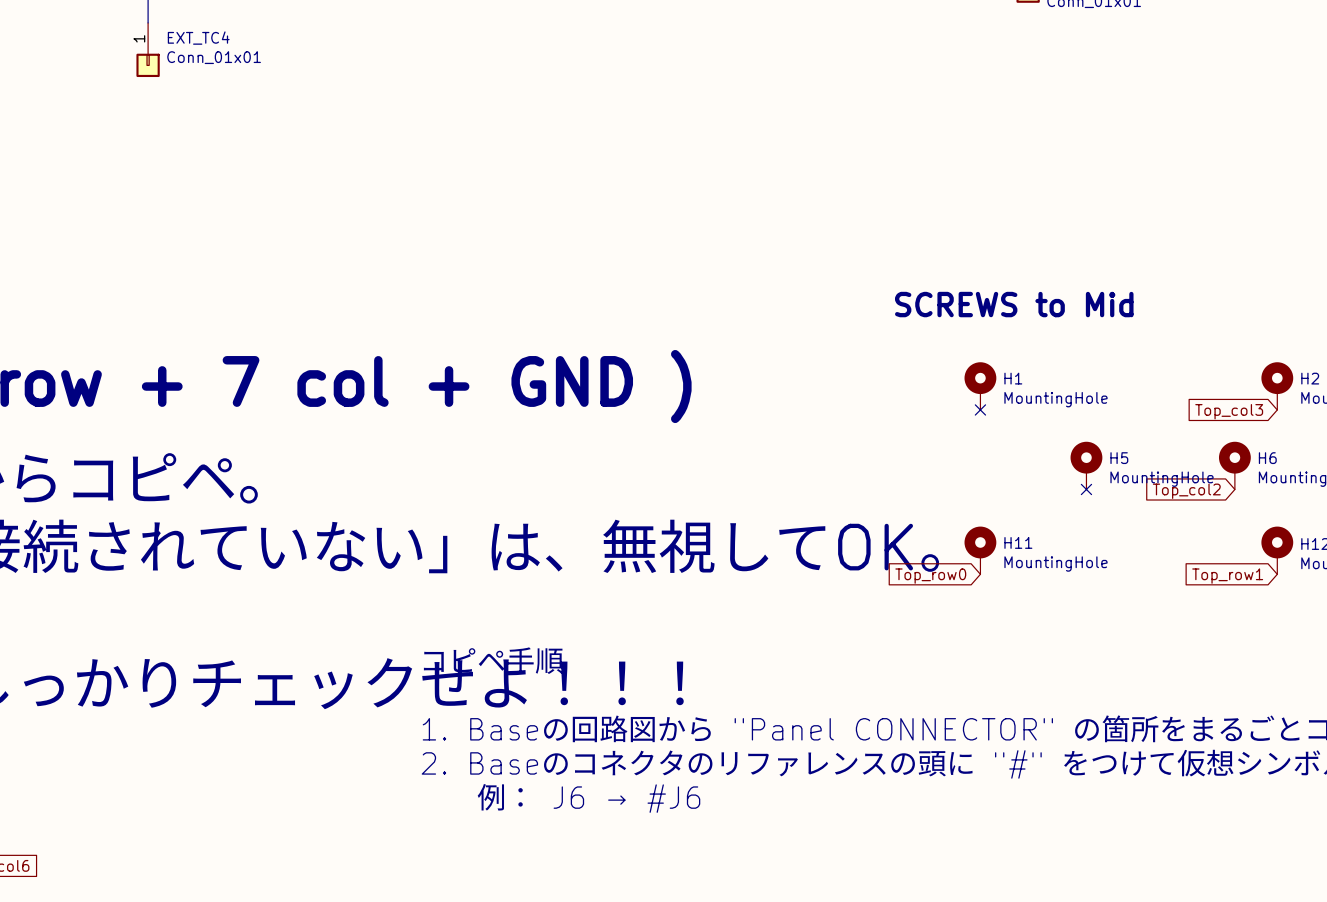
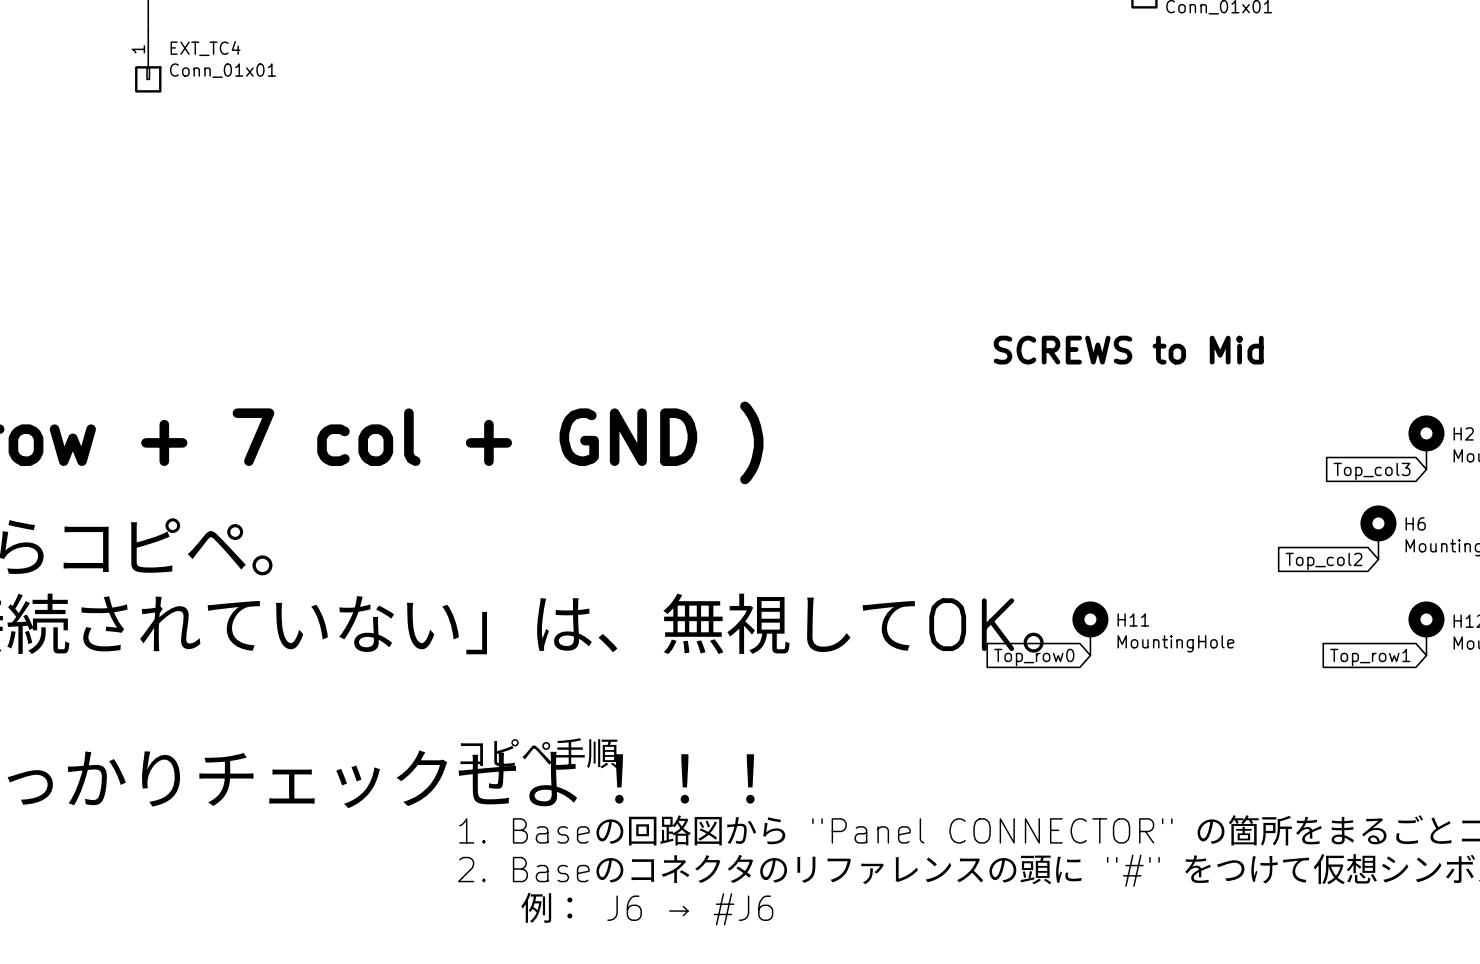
H1: MountingHole (980, 386) -> none
no-connect mark: (980, 409) -> none
H5: MountingHole (1086, 465) -> none
no-connect mark: (1086, 489) -> none

